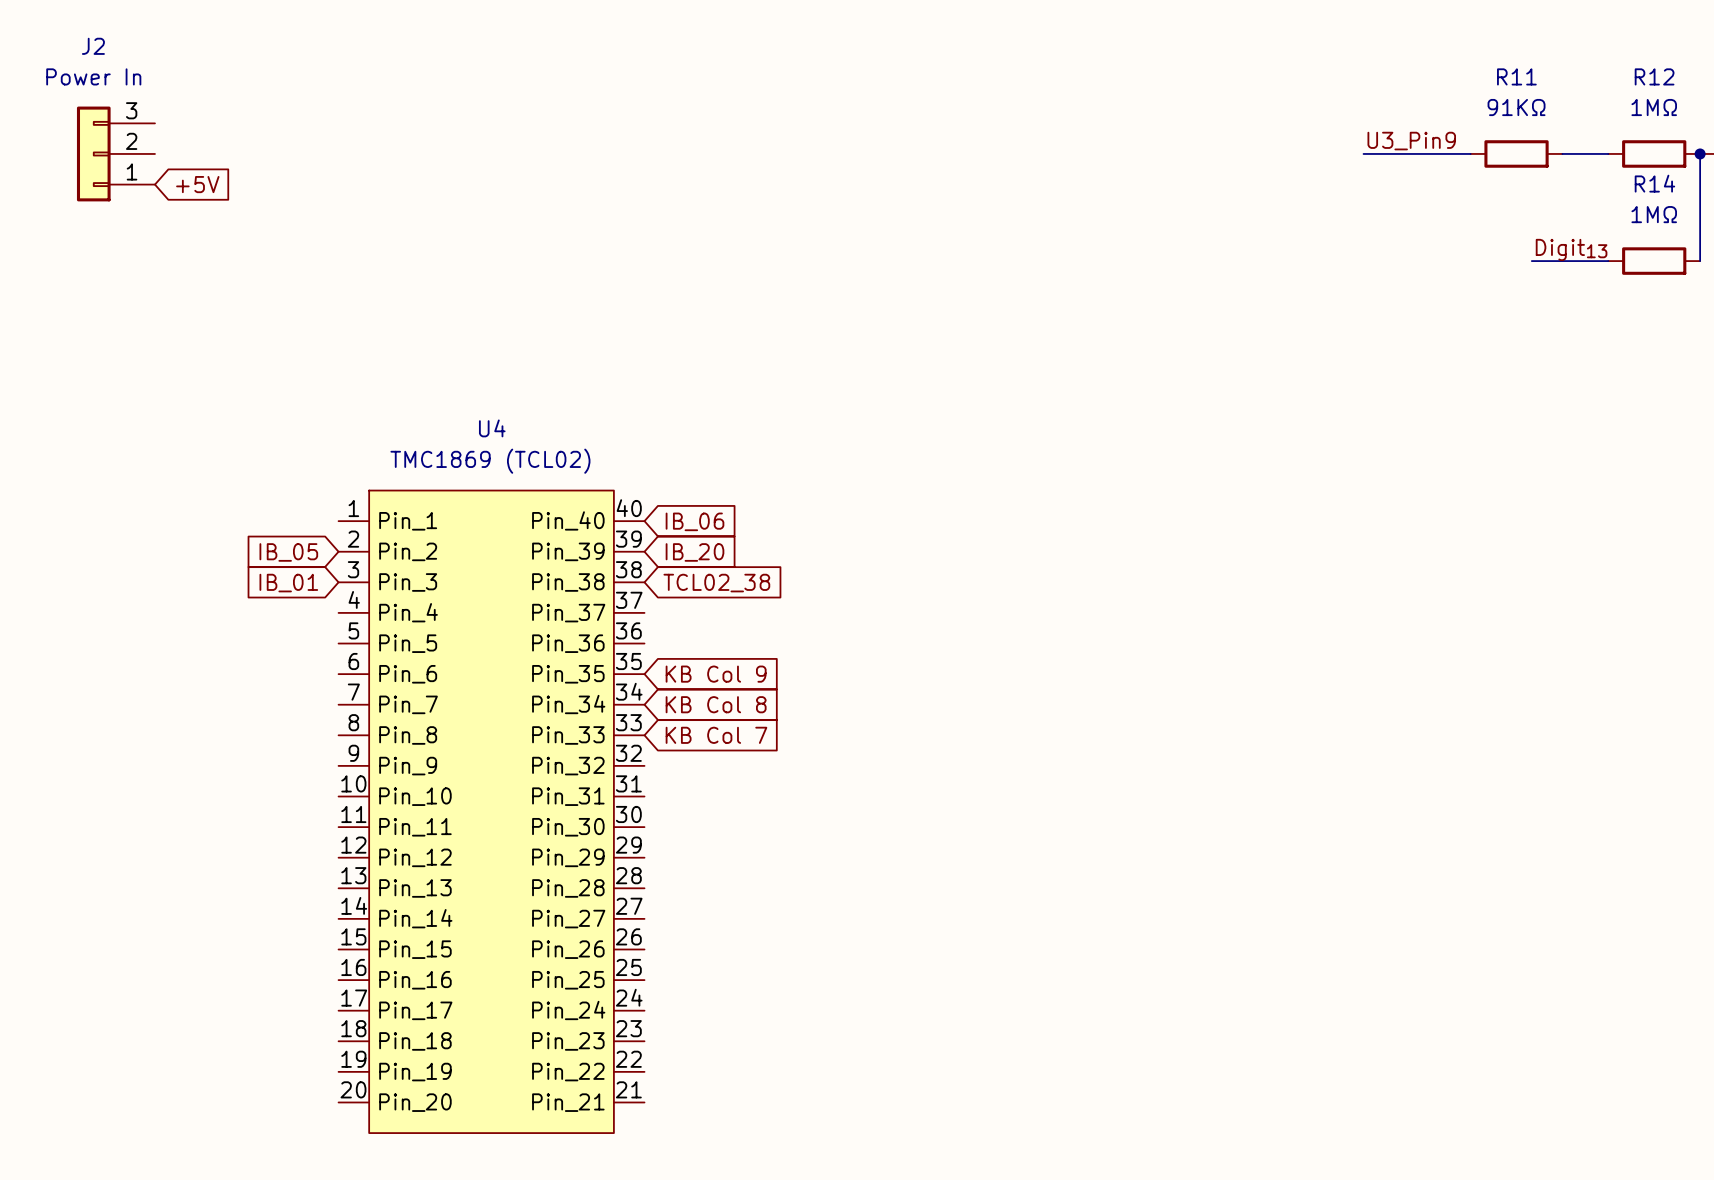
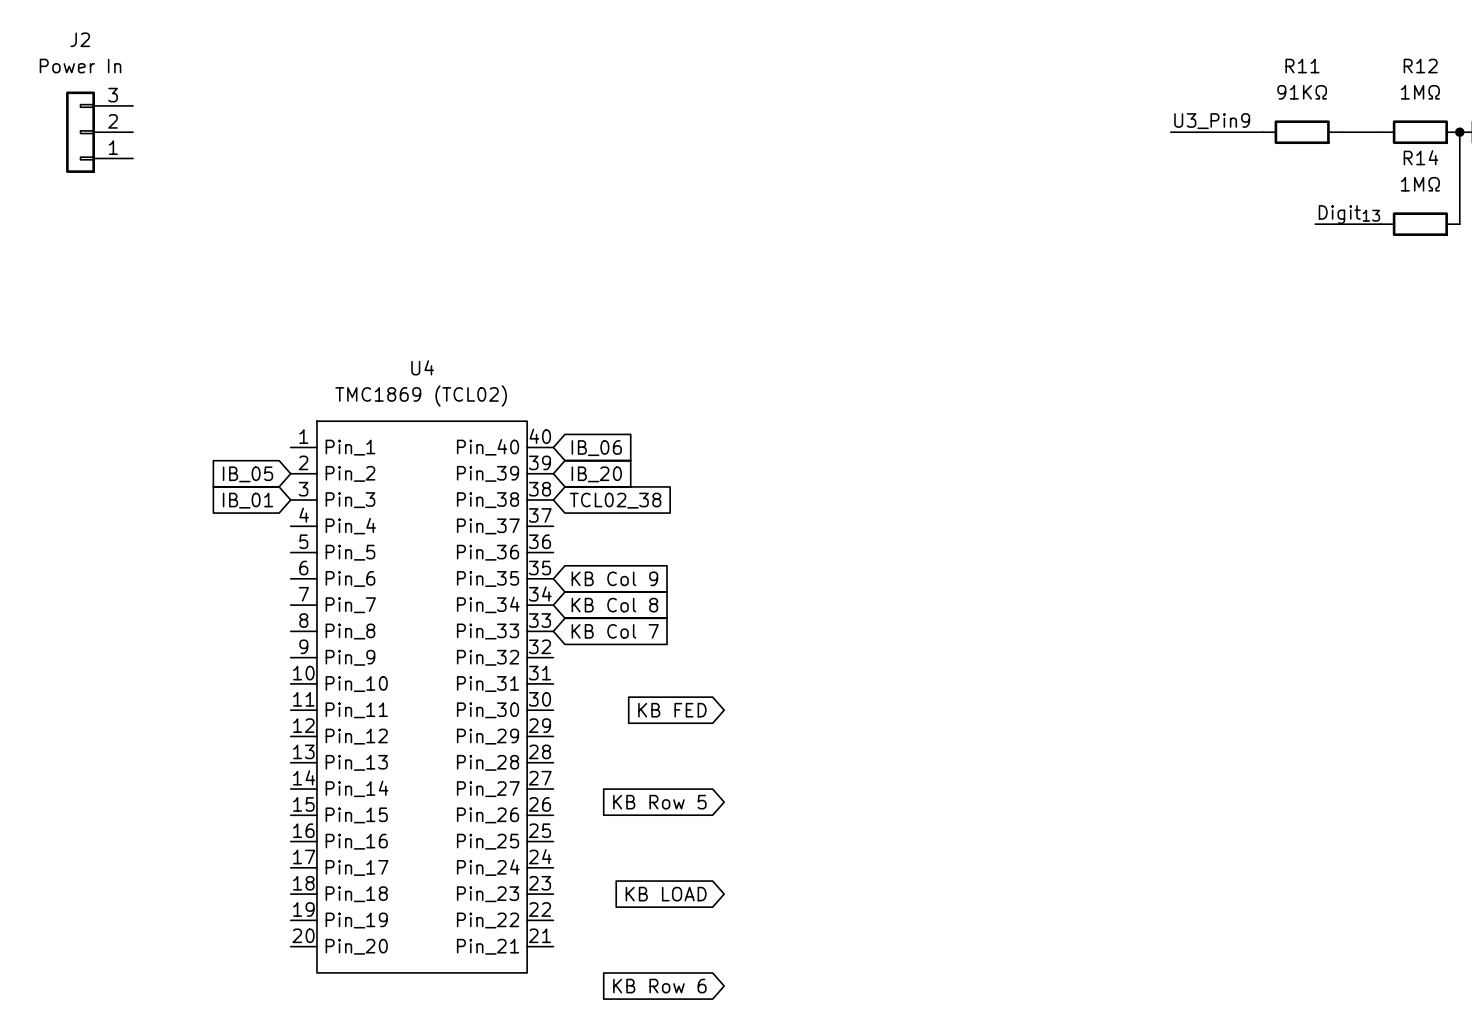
global label: +5V (197, 184) -> none
global label: none -> KB FED (672, 710)
global label: none -> KB Row 5 (659, 802)
global label: none -> KB LOAD (666, 894)
global label: none -> KB Row 6 (659, 986)

